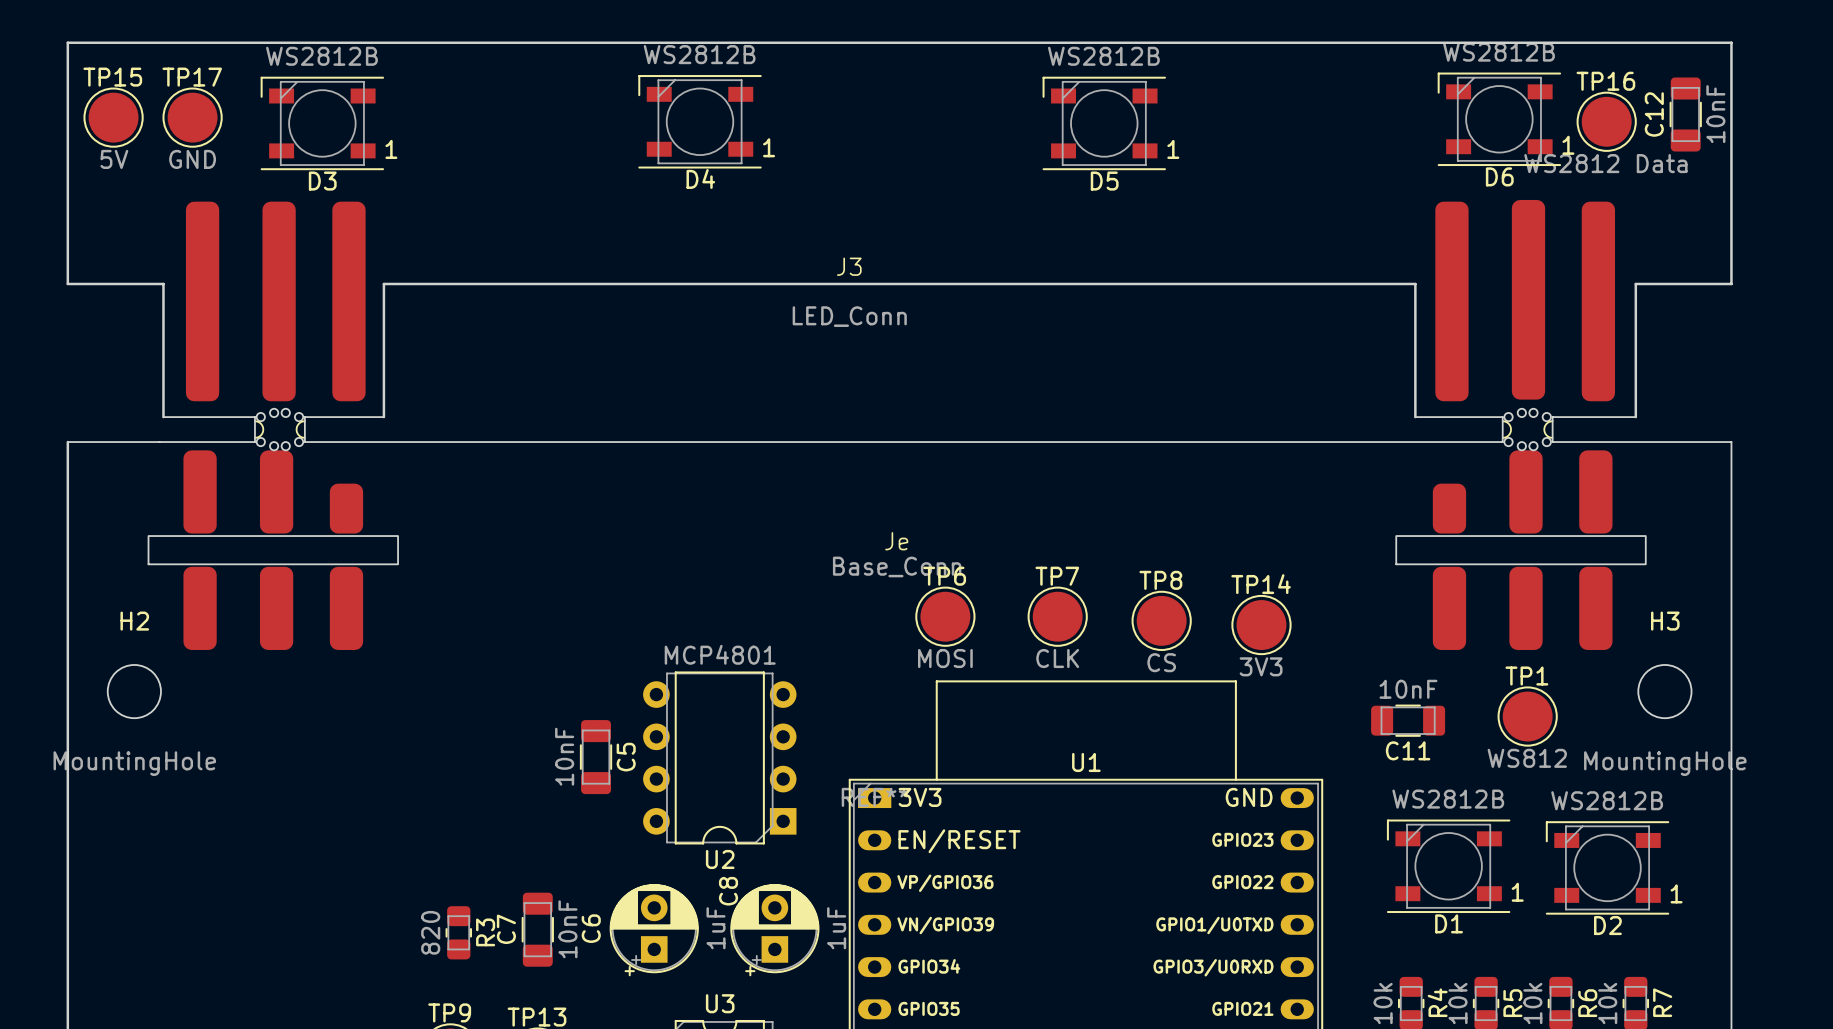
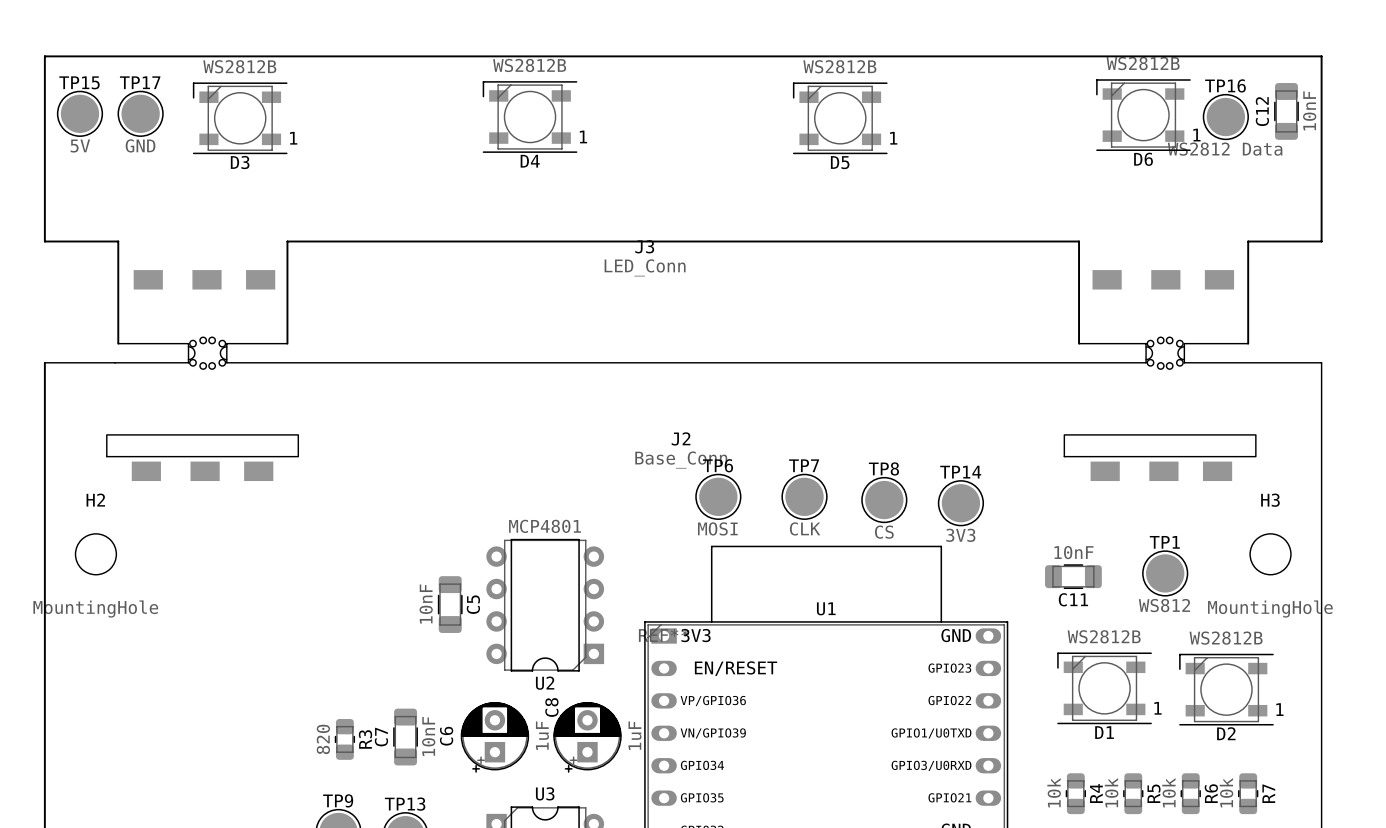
J3 footprint: [185, 199, 1616, 402] -> [133, 270, 1235, 290]
Je: Base_Conn (897, 550) -> none
J2: none -> Base_Conn (681, 457)

